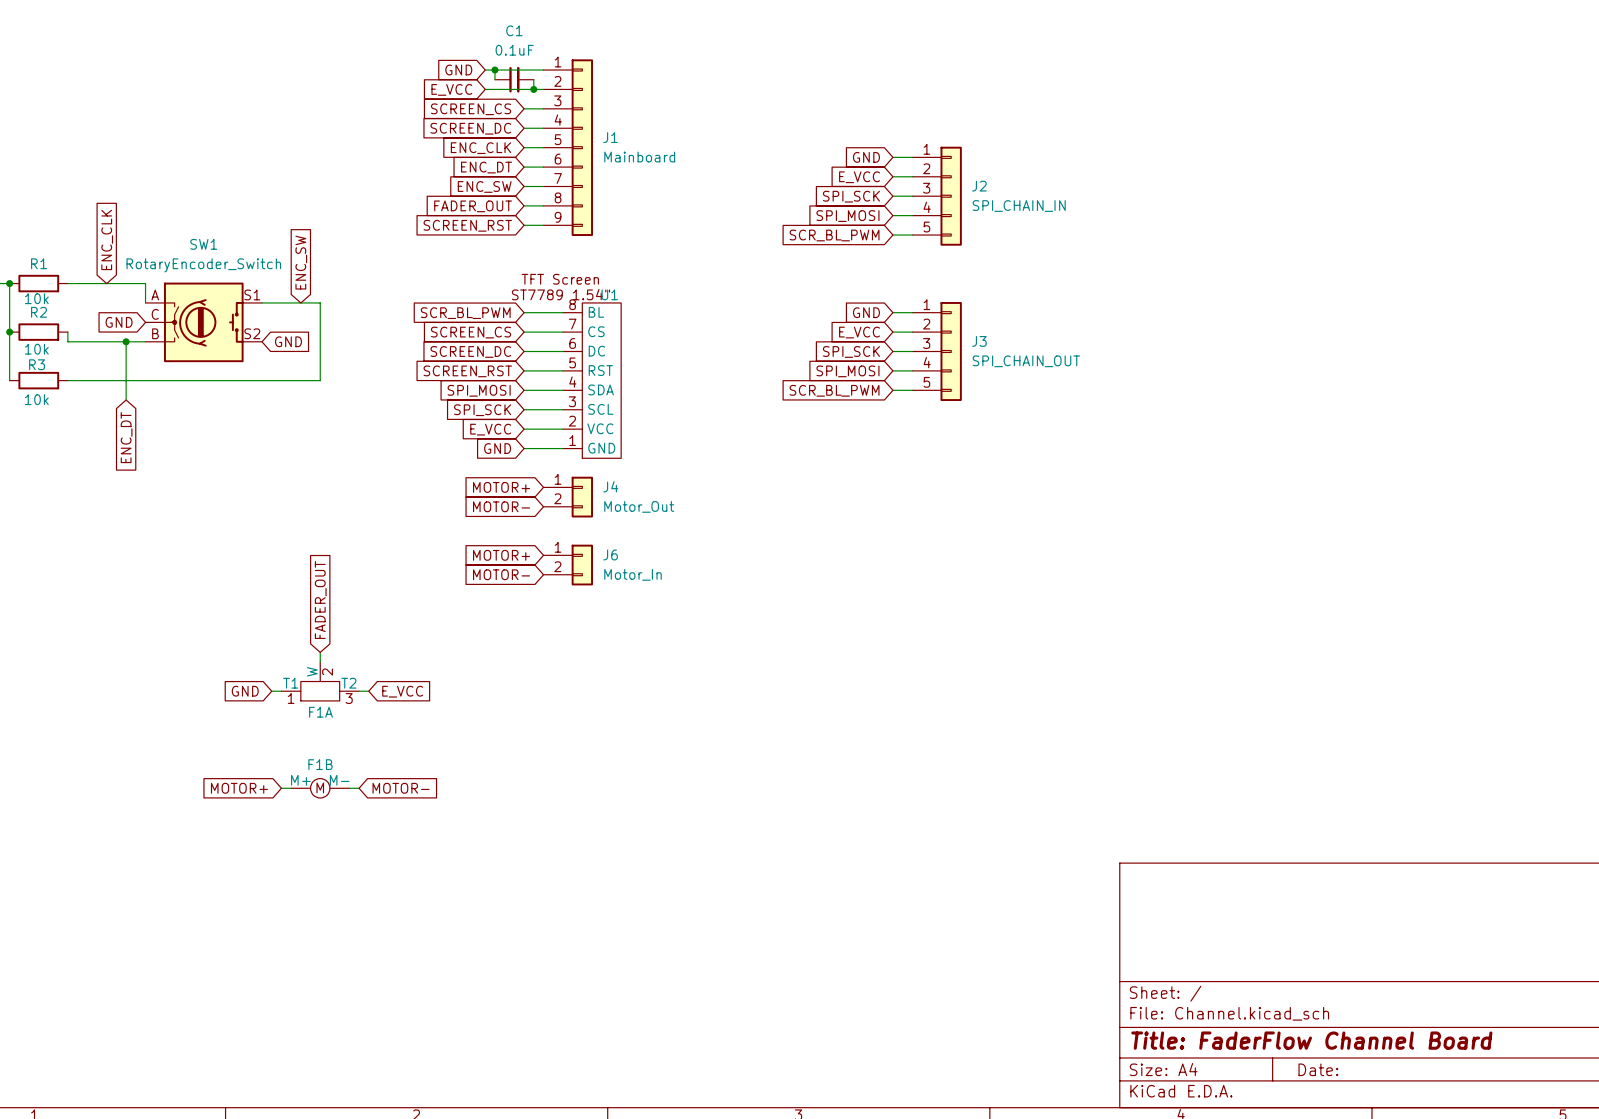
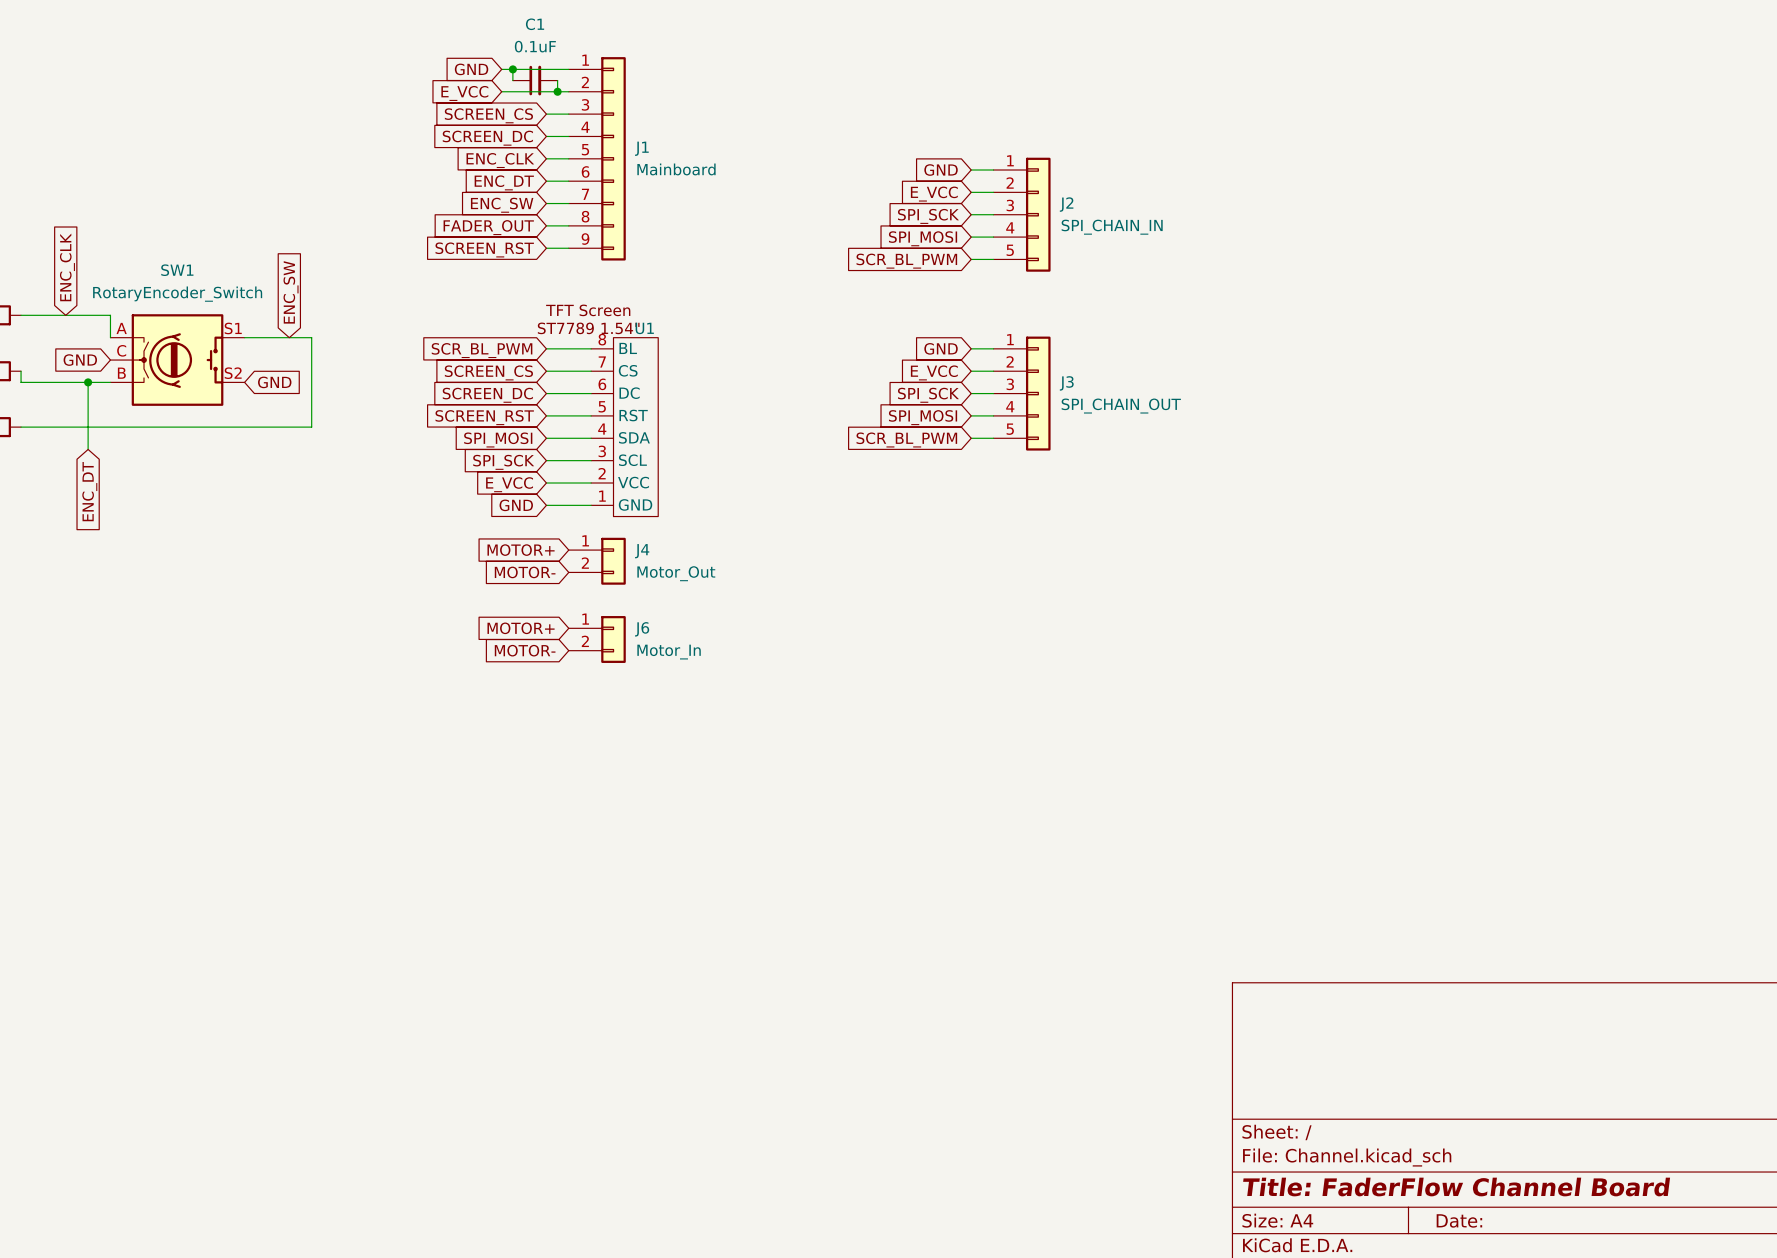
global label: FADER_OUT (320, 600) -> none
wire: (320, 652) (320, 662) -> none
F1A: (320, 681) -> none
global label: GND (245, 691) -> none
wire: (271, 691) (281, 691) -> none
wire: (359, 691) (368, 691) -> none
global label: E_VCC (402, 691) -> none
global label: MOTOR+ (239, 788) -> none
wire: (281, 788) (291, 788) -> none
F1B: (320, 788) -> none
wire: (349, 788) (359, 788) -> none
global label: MOTOR- (401, 788) -> none

